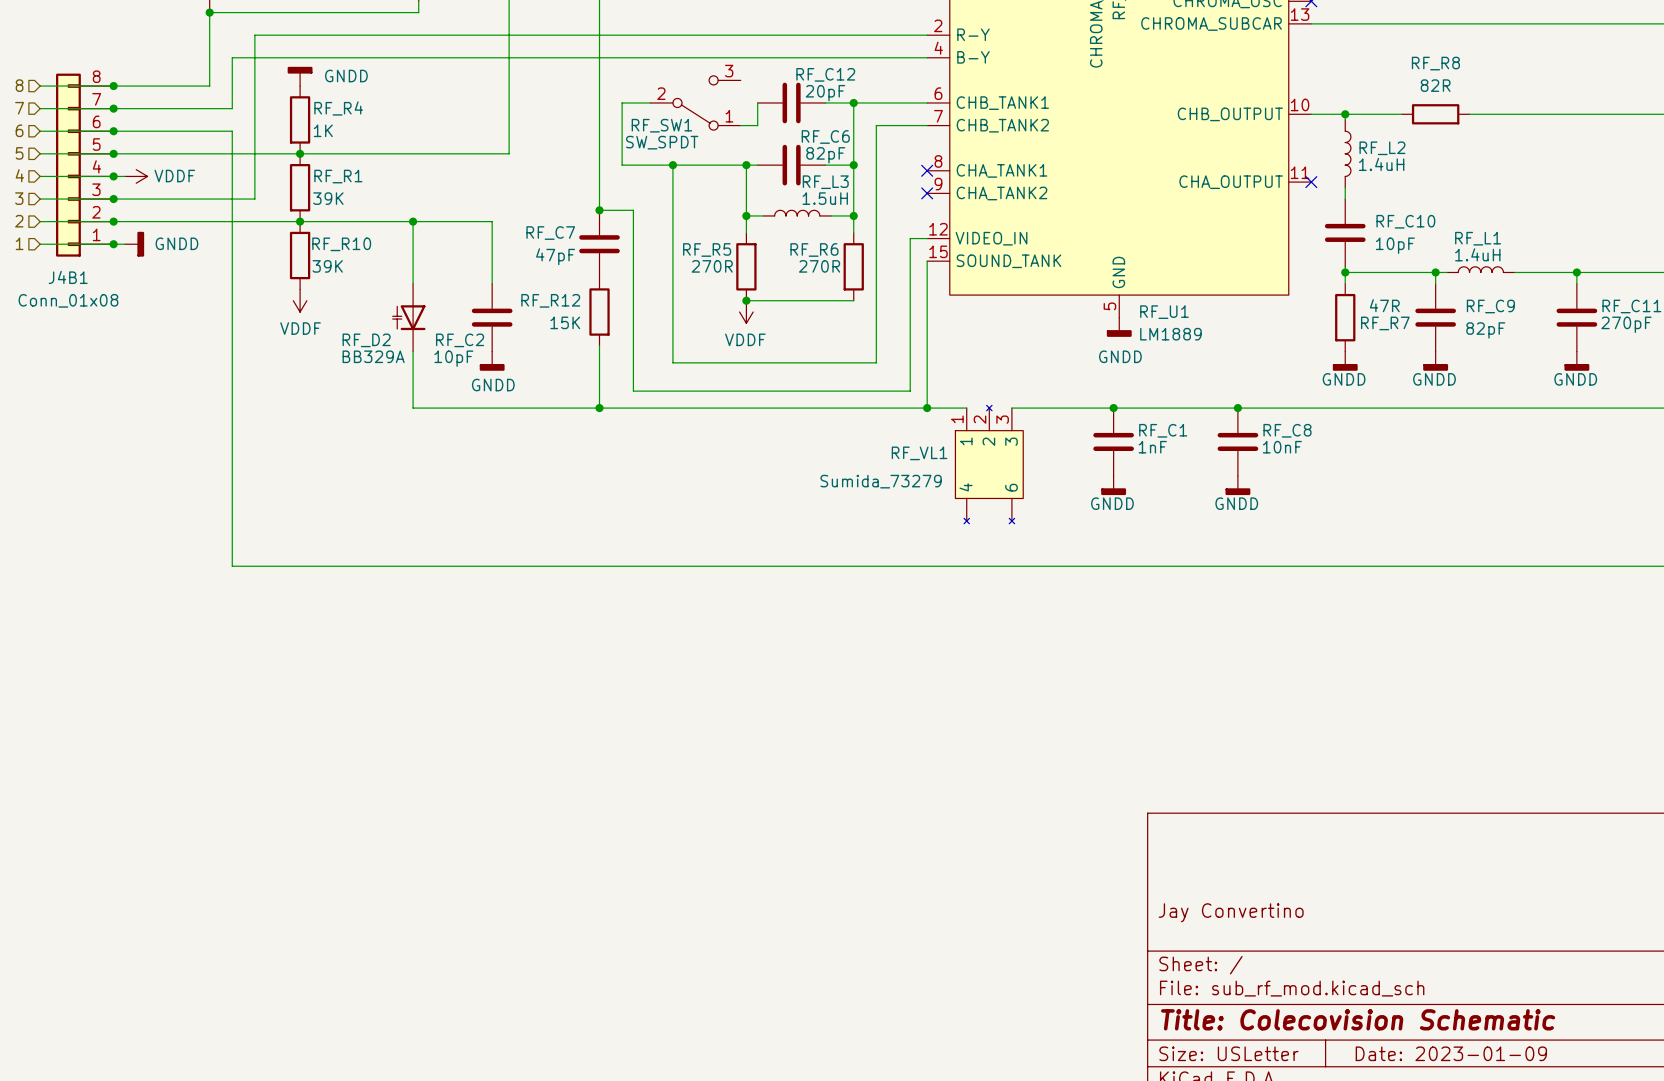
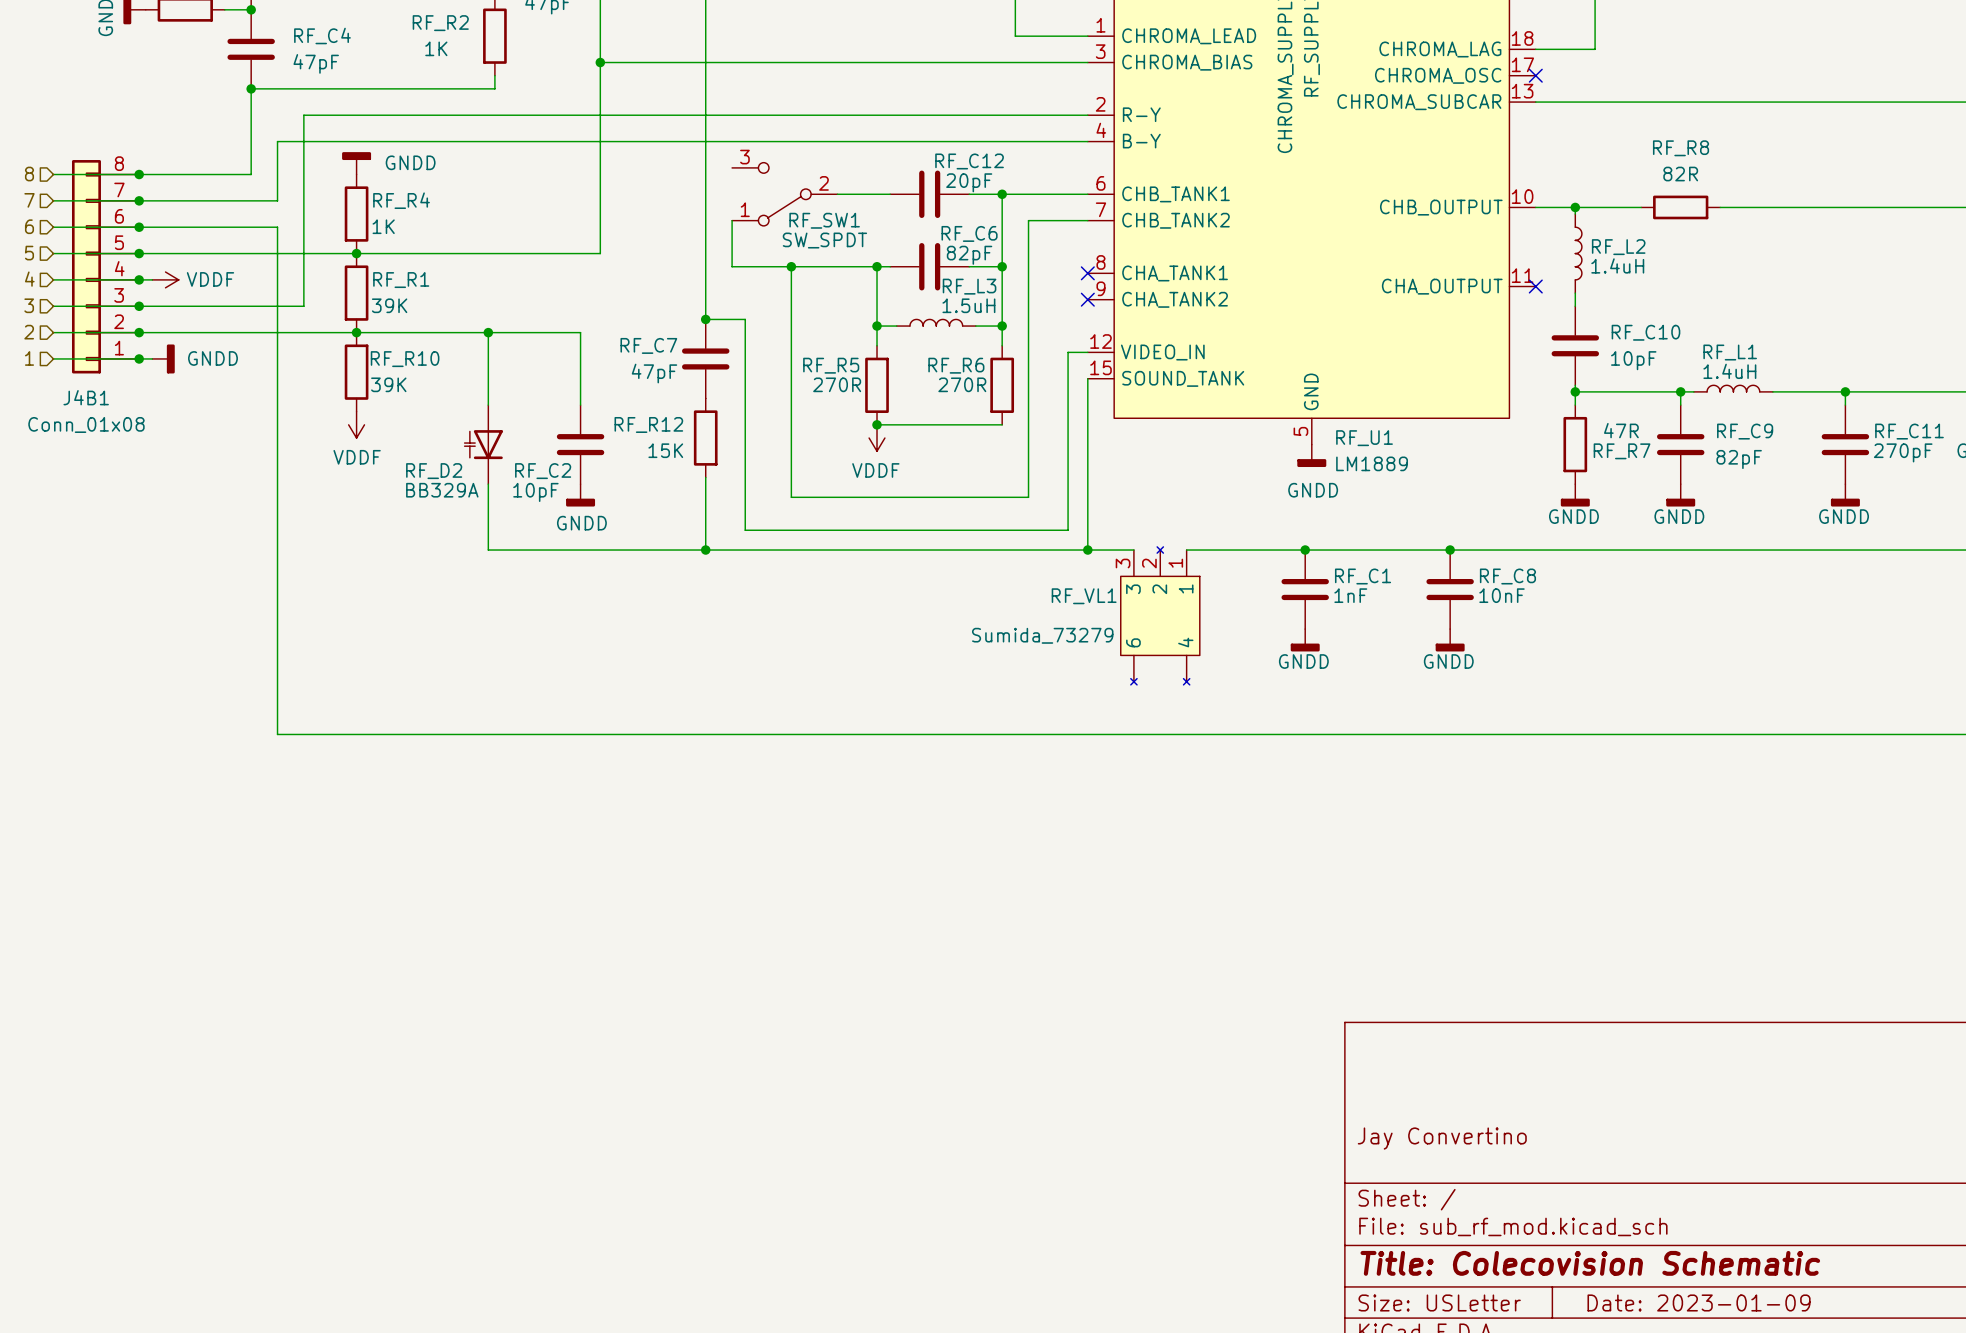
wire: (650, 102) (622, 102) (622, 125) -> none
RF_SW1 flip: as is (695, 102) -> left-right (784, 194)
wire: (757, 102) (757, 125) (740, 125) -> (890, 194) (837, 194)
RF_VL1 flip: as is (989, 464) -> left-right (1160, 615)
RF_VL1 value position: Sumida_73279 (881, 481) -> Sumida_73279 (1042, 635)

